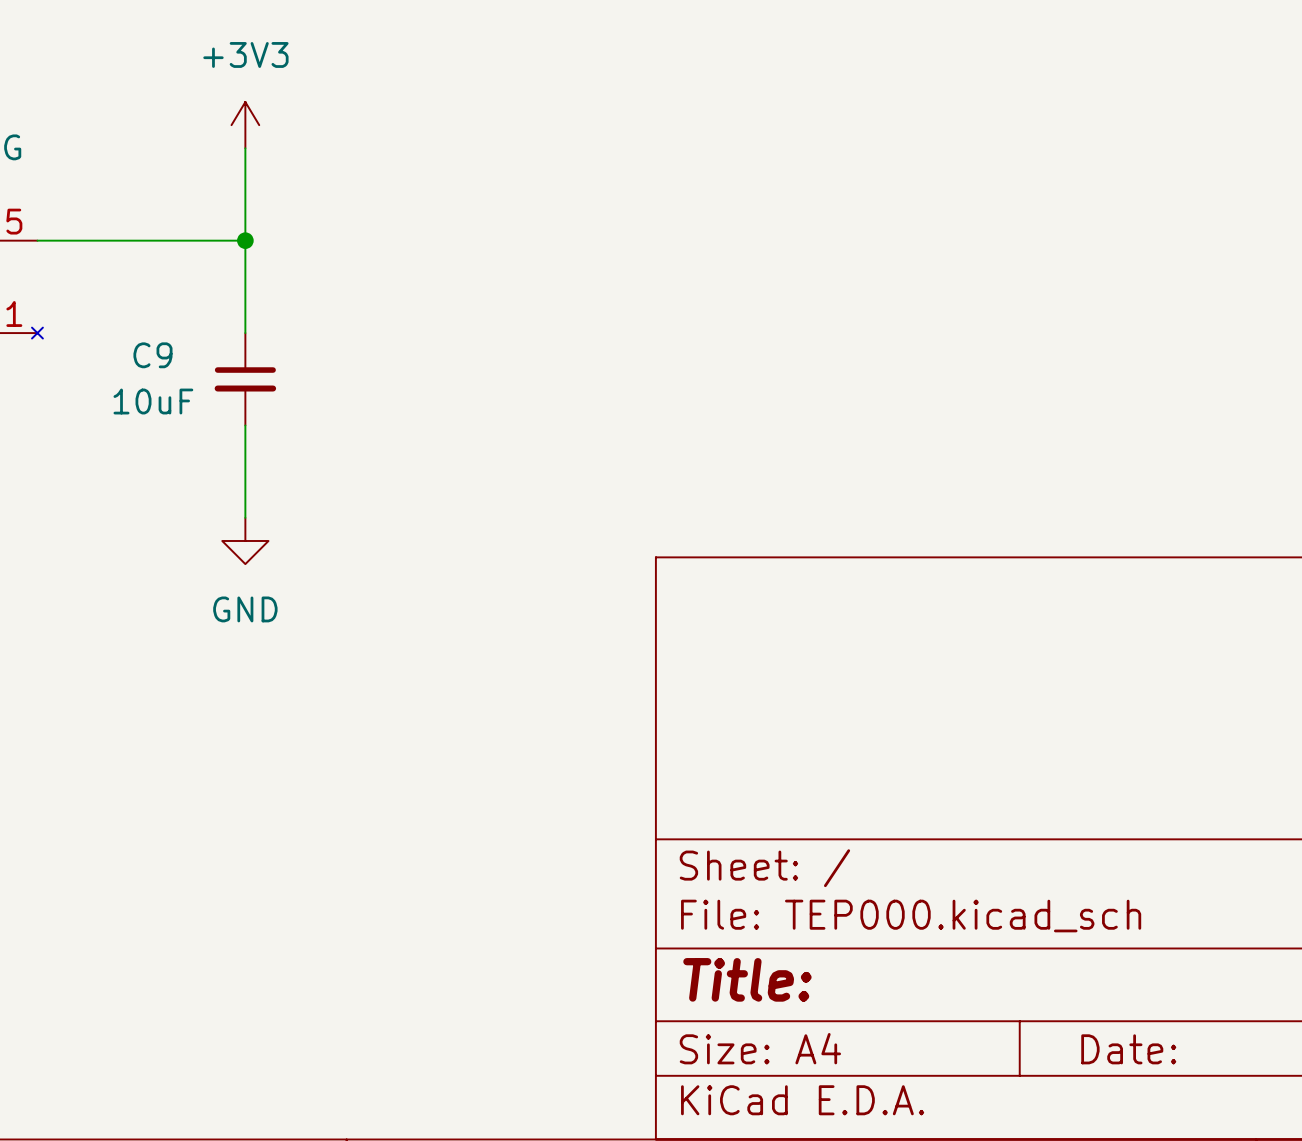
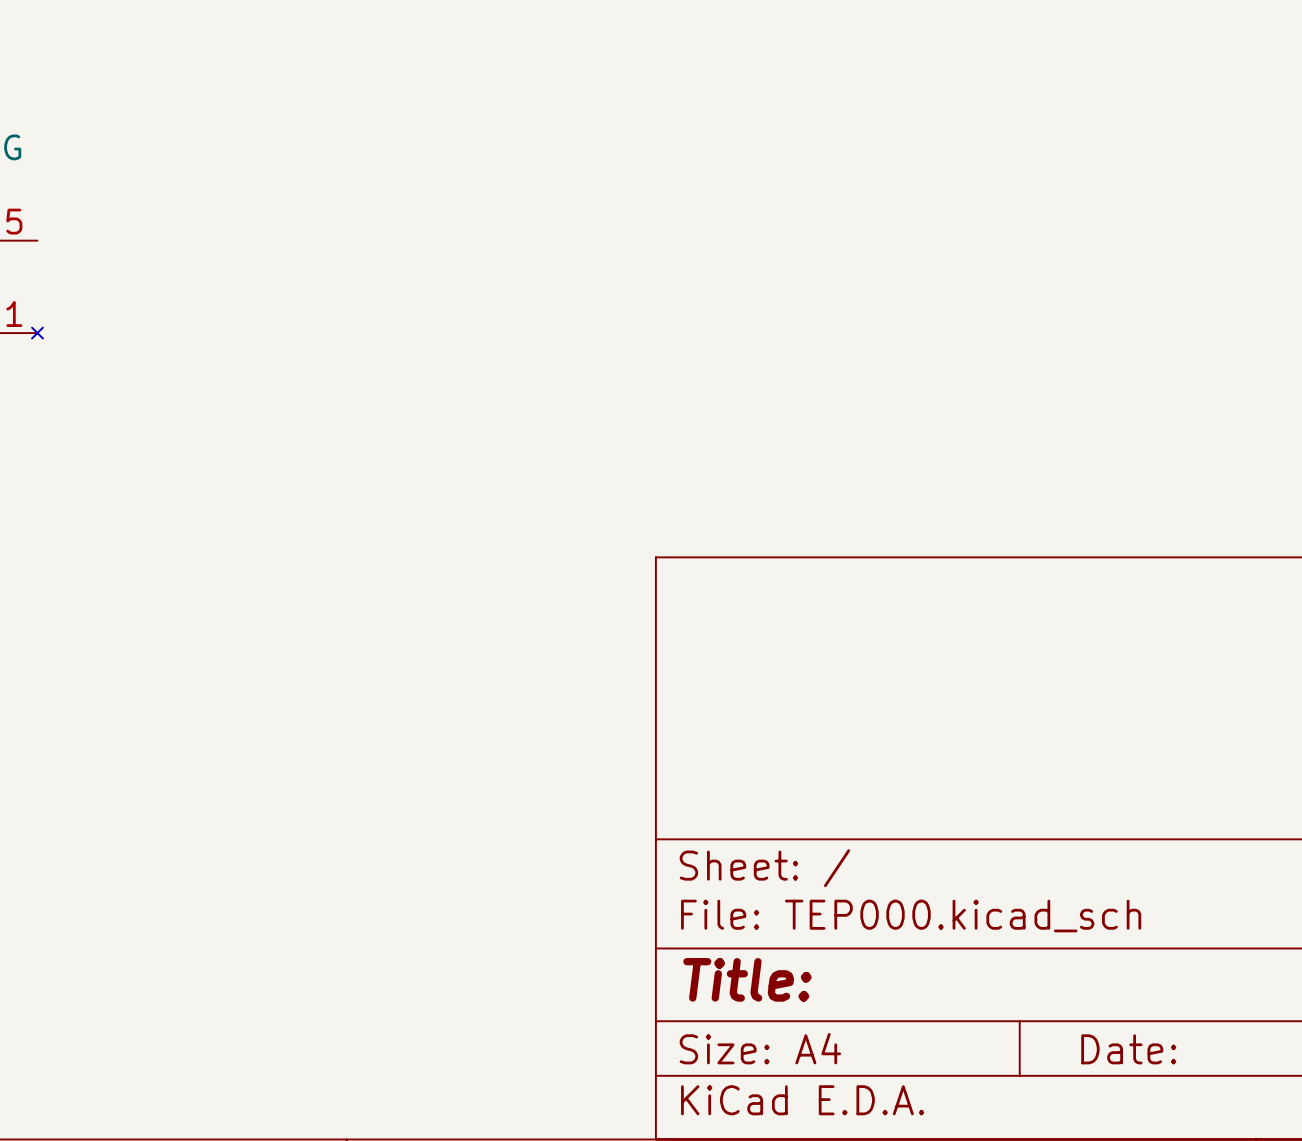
power symbol: +3V3 (245, 125) -> none
wire: (245, 148) (245, 333) -> none
wire: (37, 240) (245, 240) -> none
junction: (245, 240) -> none
C9: 10uF (245, 379) -> none
wire: (245, 425) (245, 517) -> none
power symbol: GND (245, 540) -> none

